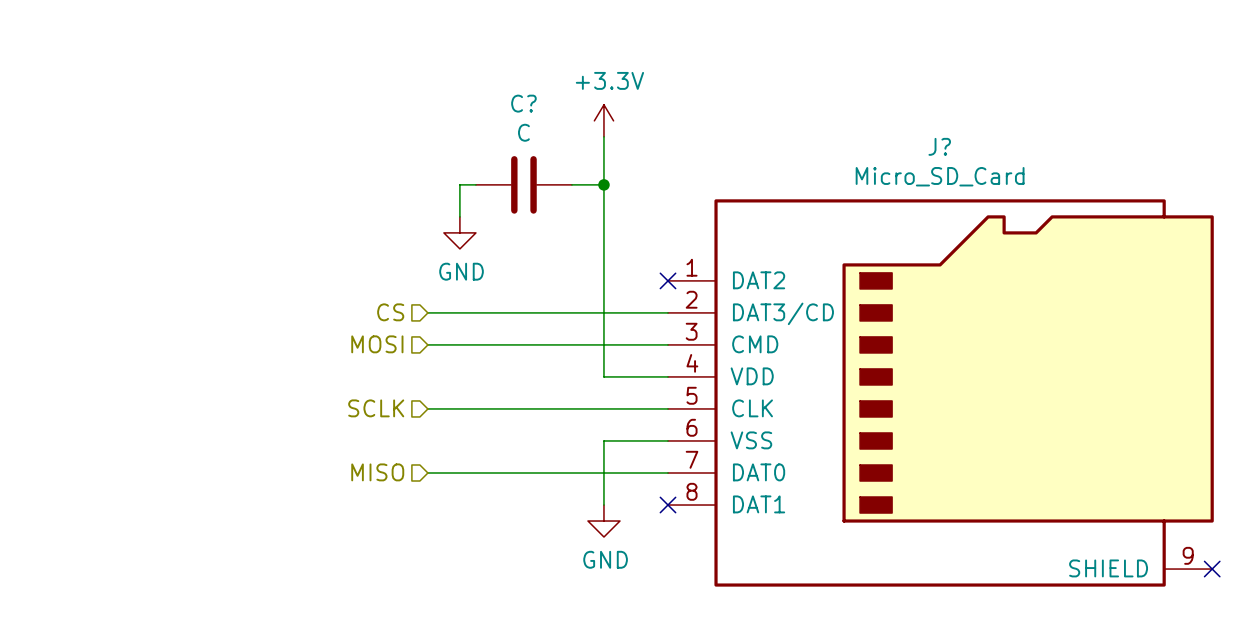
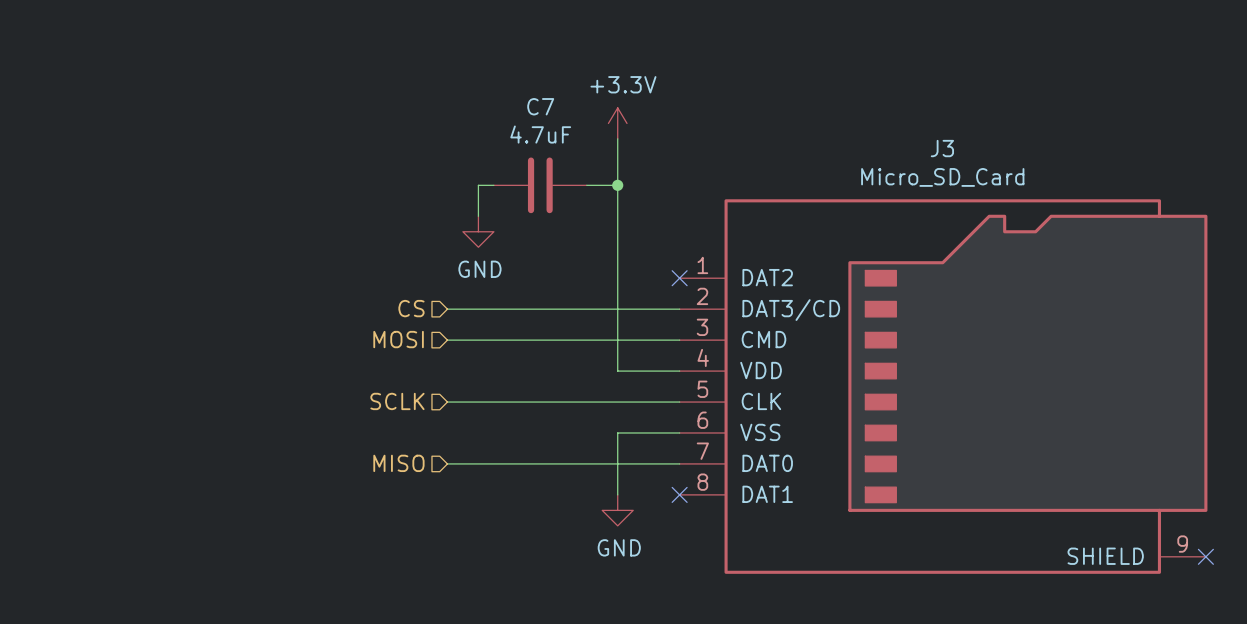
C? name: C? (523, 103) -> C7 (540, 106)
C? value: C (523, 132) -> 4.7uF (540, 134)
J? name: J? (939, 146) -> J3 (942, 148)

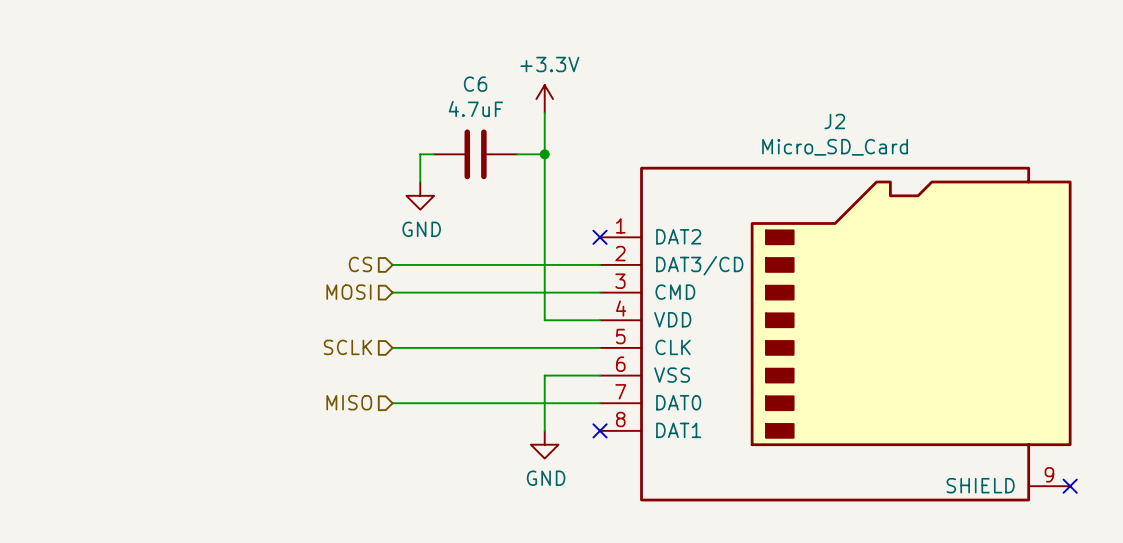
C7 name: C7 (540, 106) -> C6 (475, 84)
J3 name: J3 (942, 148) -> J2 (834, 121)

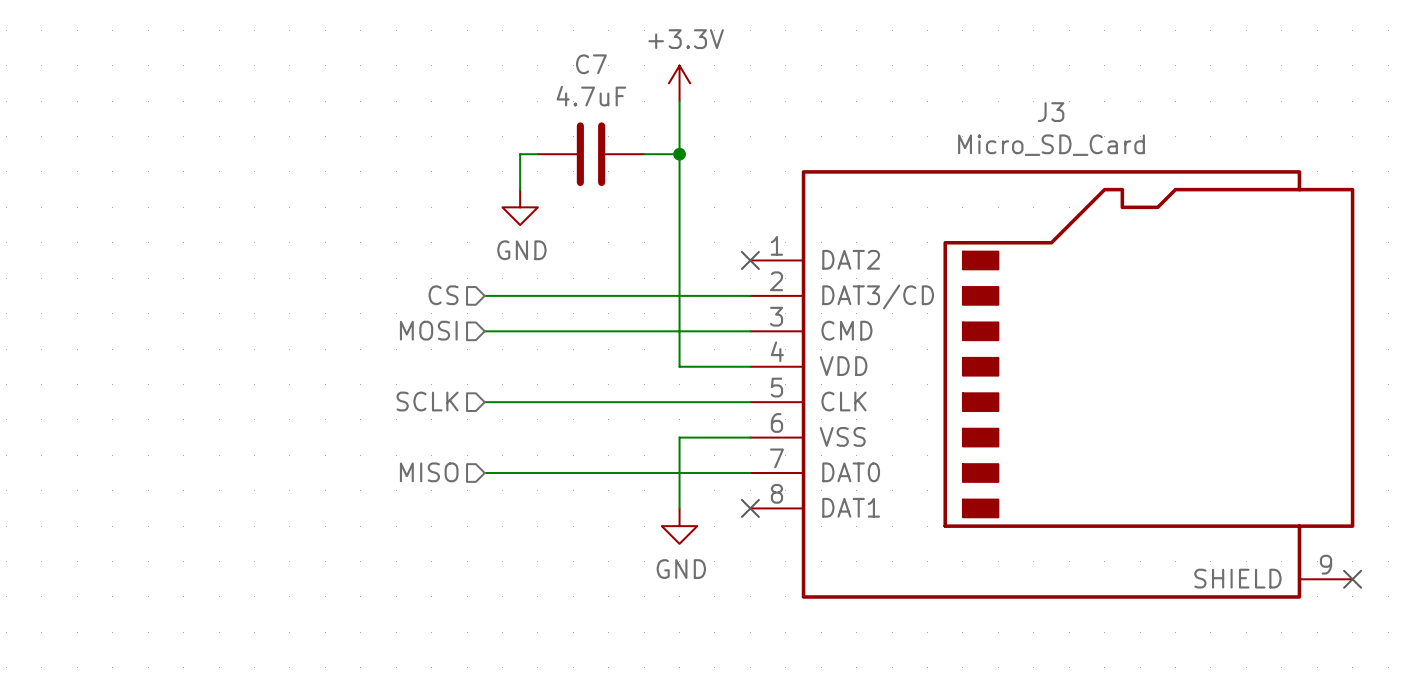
C6 name: C6 (475, 84) -> C7 (591, 64)
J2 name: J2 (834, 121) -> J3 (1051, 112)

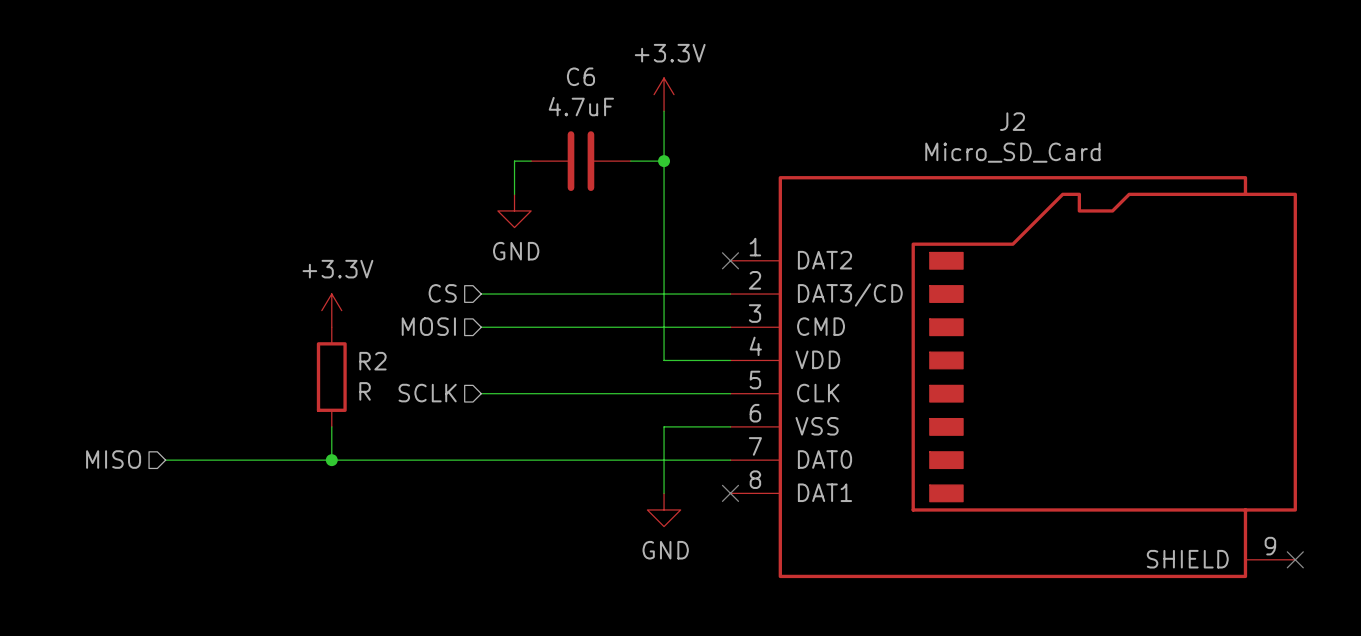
C7 name: C7 (591, 64) -> C6 (580, 76)
J3 name: J3 (1051, 112) -> J2 (1012, 121)
power symbol: none -> +3.3V (331, 310)
R2: none -> R (331, 377)
wire: none -> (331, 426) (331, 460)
hierarchical label position: MISO (429, 472) -> MISO (113, 459)
wire: none -> (165, 460) (481, 460)
junction: none -> (331, 460)

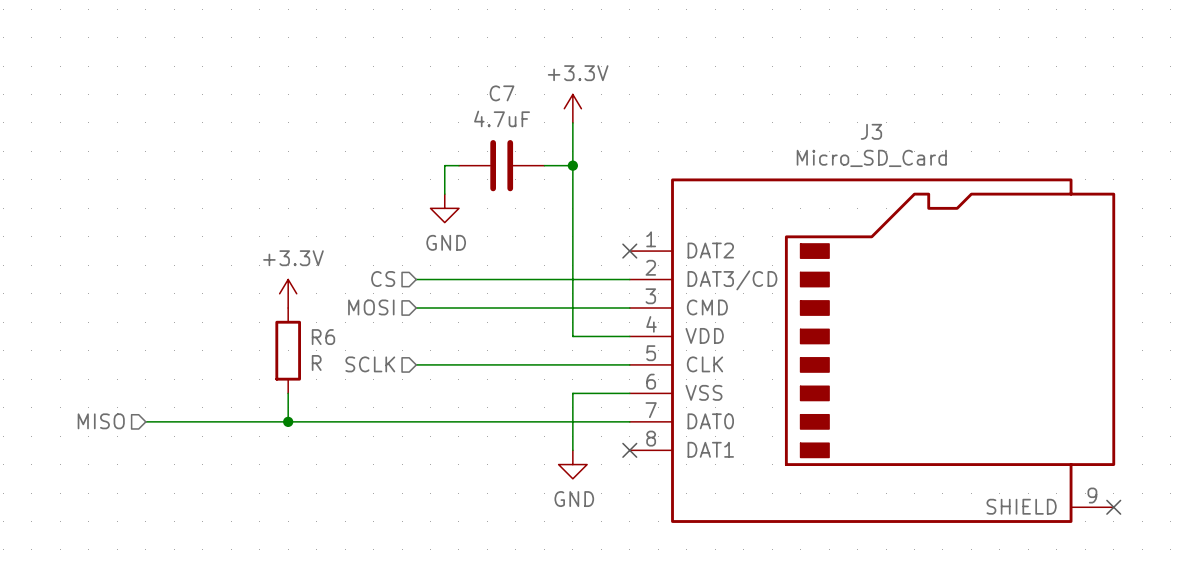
C6 name: C6 (580, 76) -> C7 (502, 93)
J2 name: J2 (1012, 121) -> J3 (871, 131)
R2 name: R2 (372, 361) -> R6 (323, 337)

